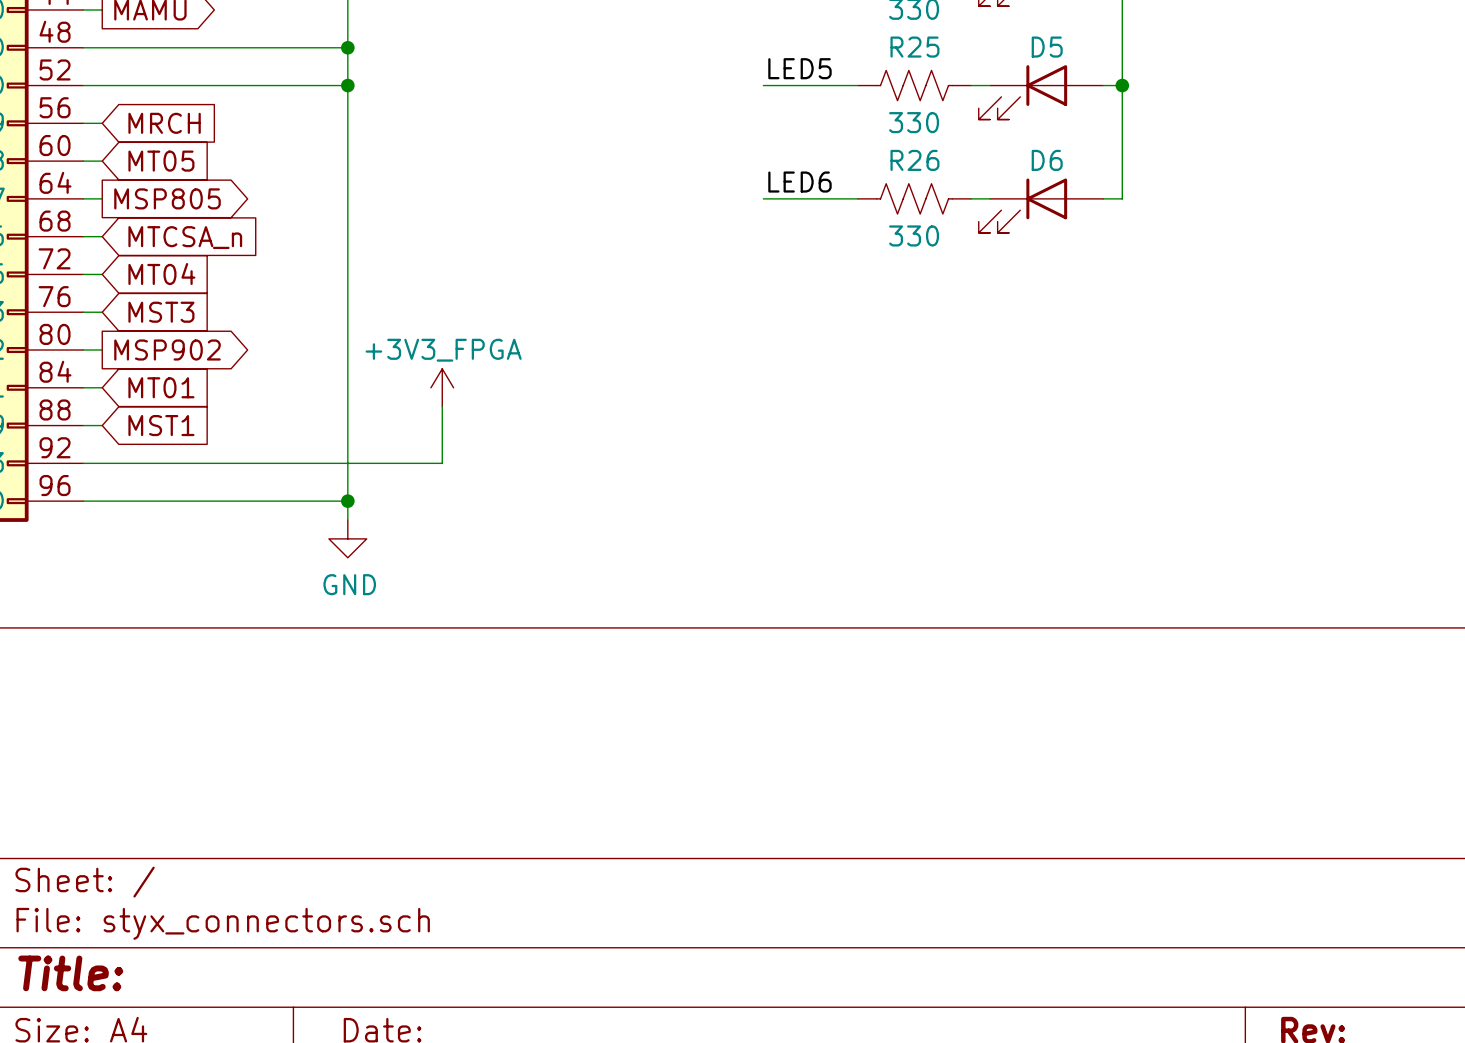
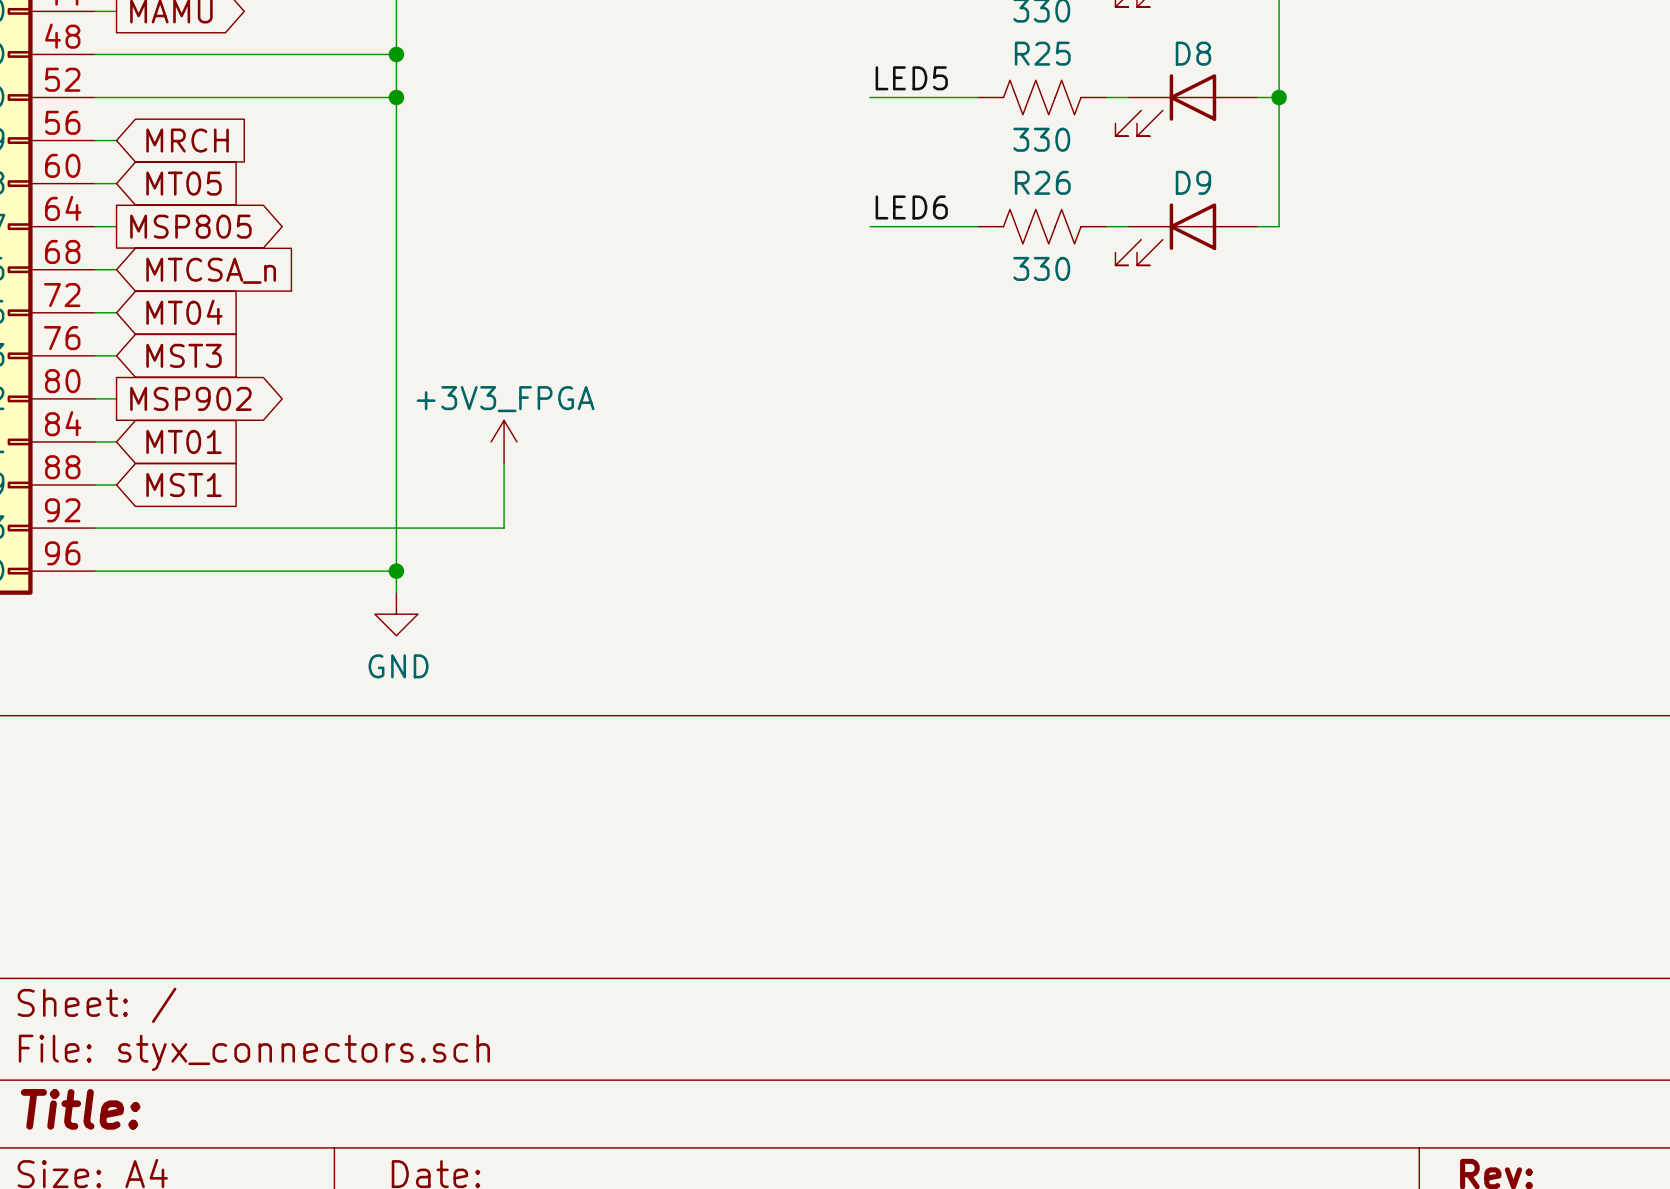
D5 name: D5 (1047, 47) -> D8 (1193, 53)
D6 name: D6 (1047, 160) -> D9 (1193, 182)

